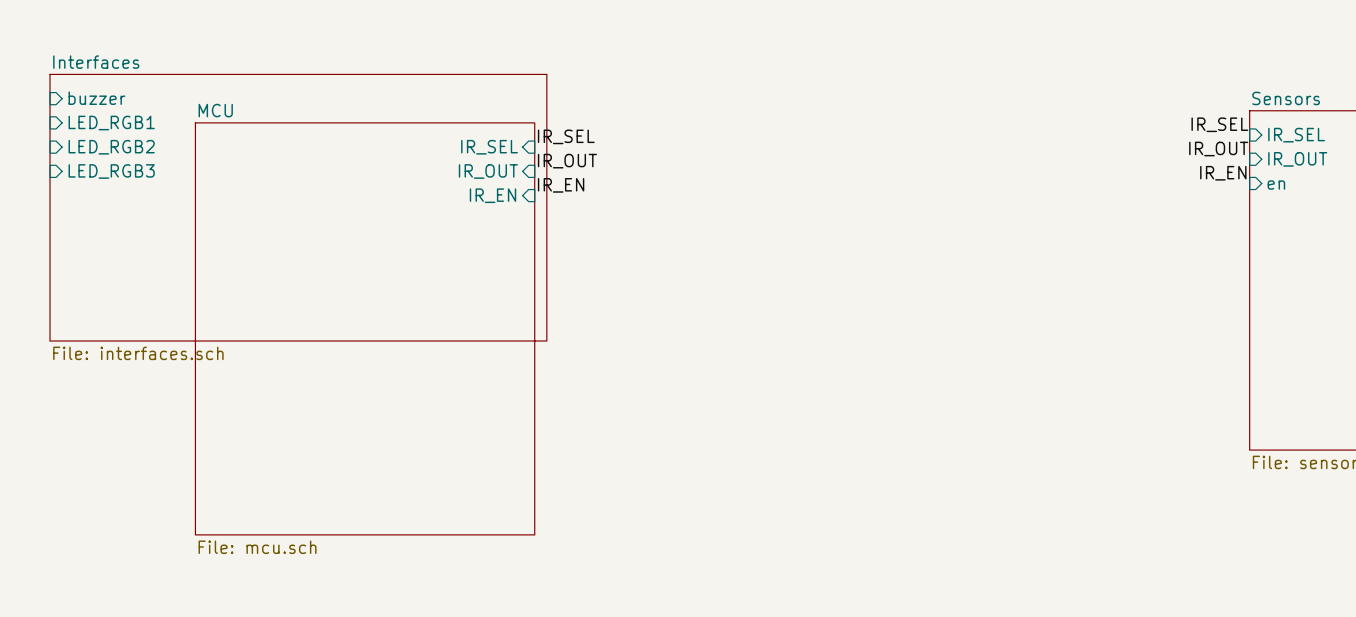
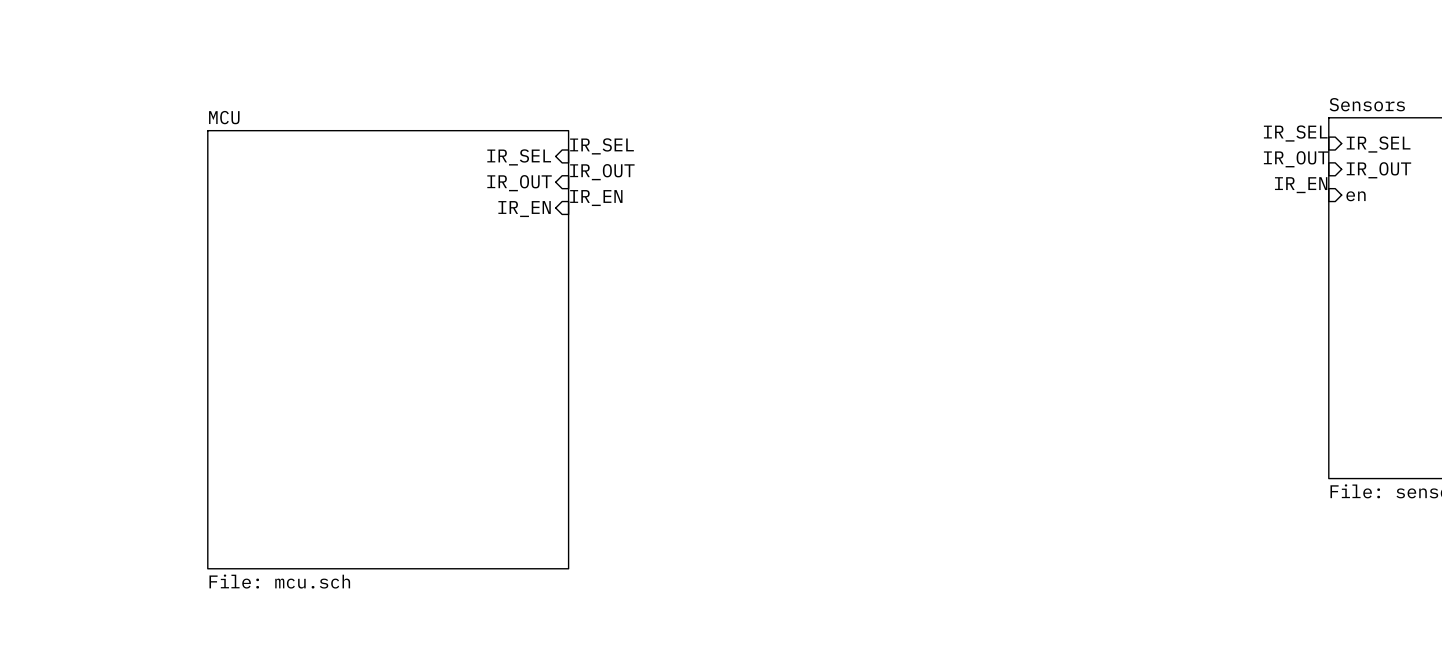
sheet pin: buzzer (96, 98) -> none
sheet pin: LED_RGB1 (111, 123) -> none
sheet pin: LED_RGB2 (111, 147) -> none
sheet pin: LED_RGB3 (111, 171) -> none
sheet Interfaces: File: interfaces.sch (298, 207) -> none

